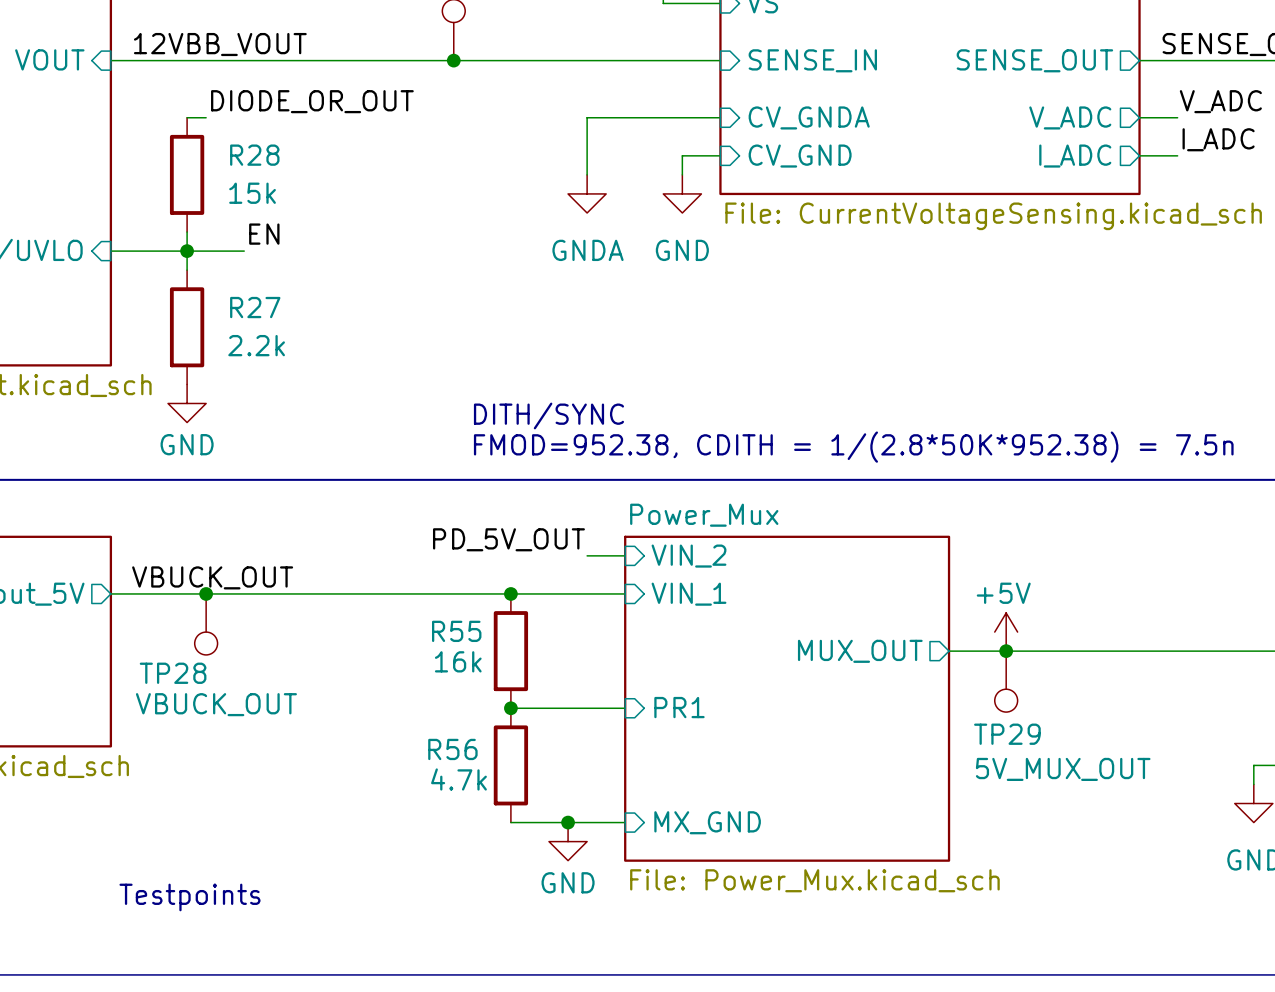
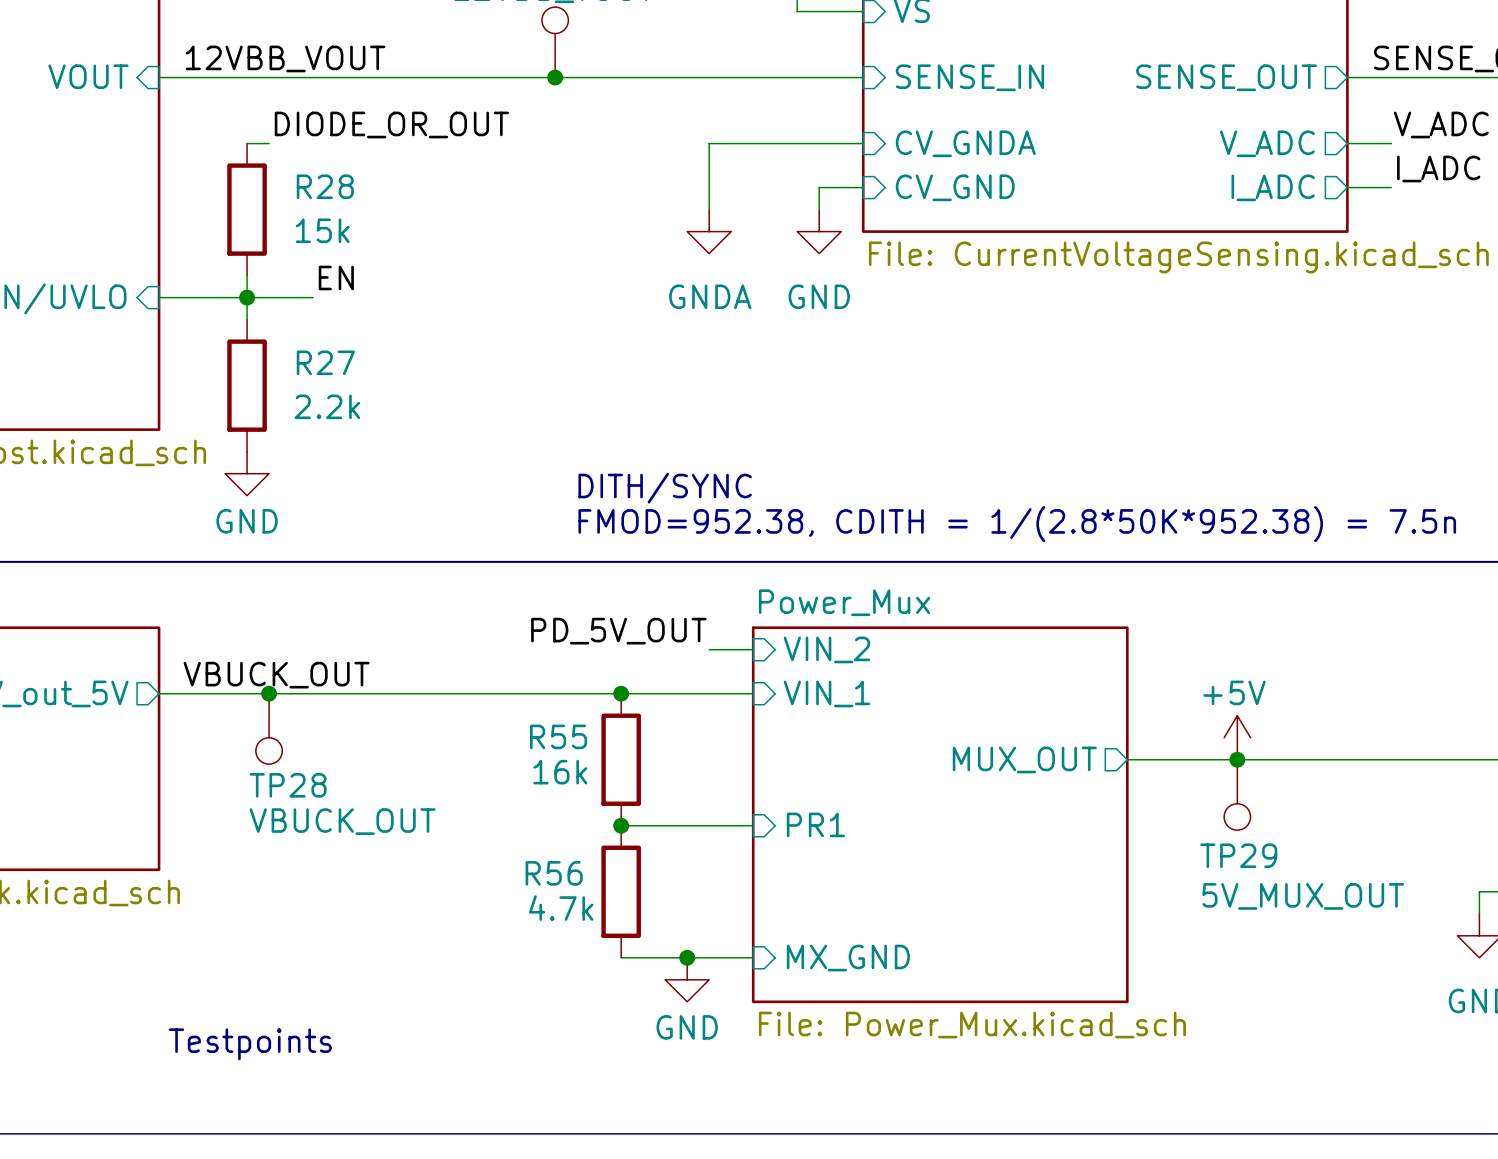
power symbol position: +5V (1006, 632) -> +5V (1237, 737)
junction position: (1006, 651) -> (1237, 759)
TP28 name position: TP28 (173, 673) -> TP28 (288, 785)
TP29 position: (1006, 681) -> (1237, 794)
TP28 value position: VBUCK_OUT (216, 704) -> VBUCK_OUT (342, 821)

